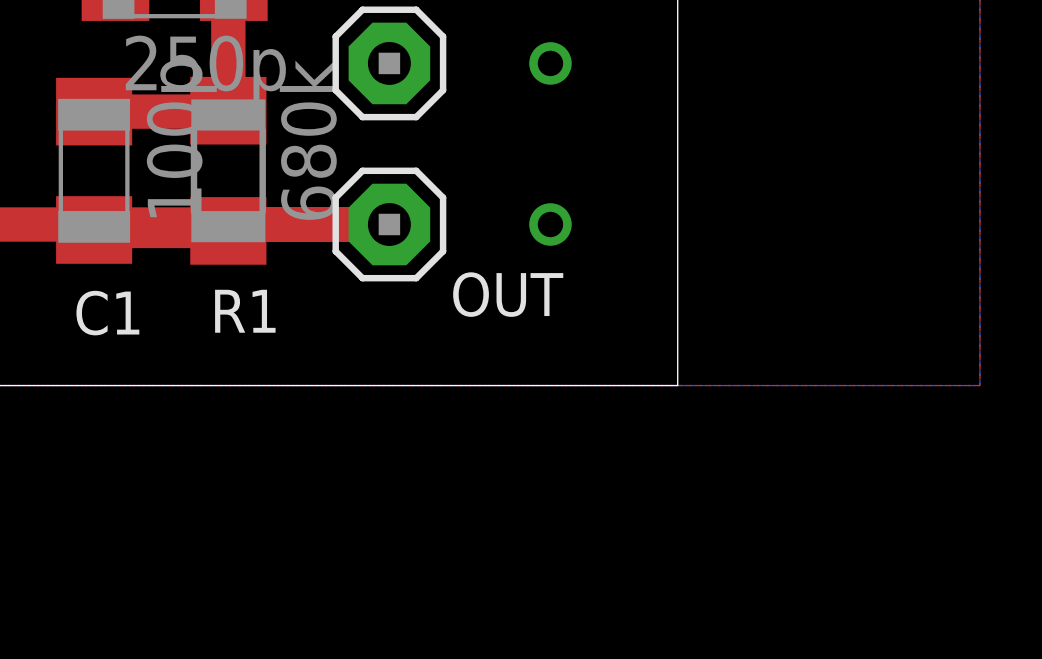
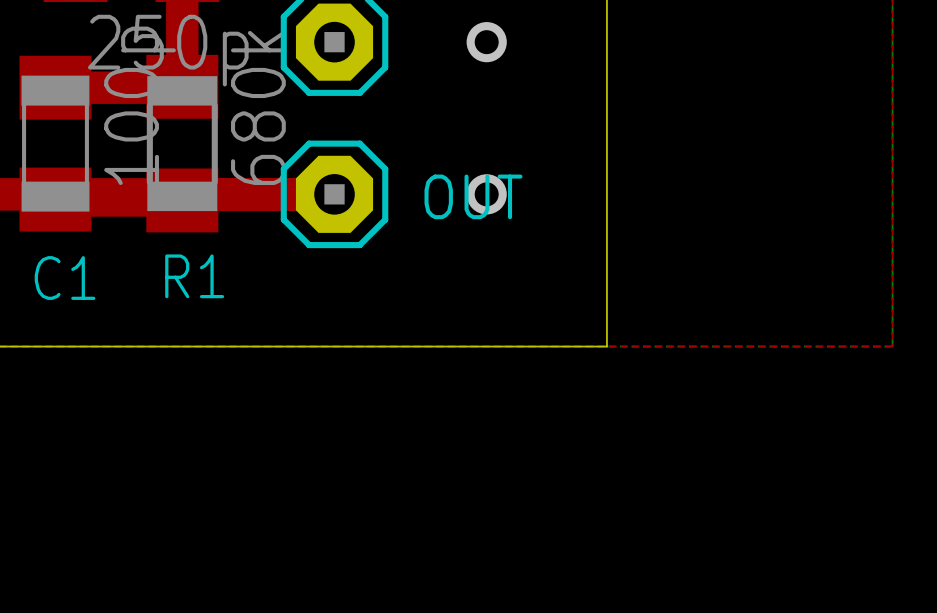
OUT name position: OUT (508, 294) -> OUT (473, 196)

